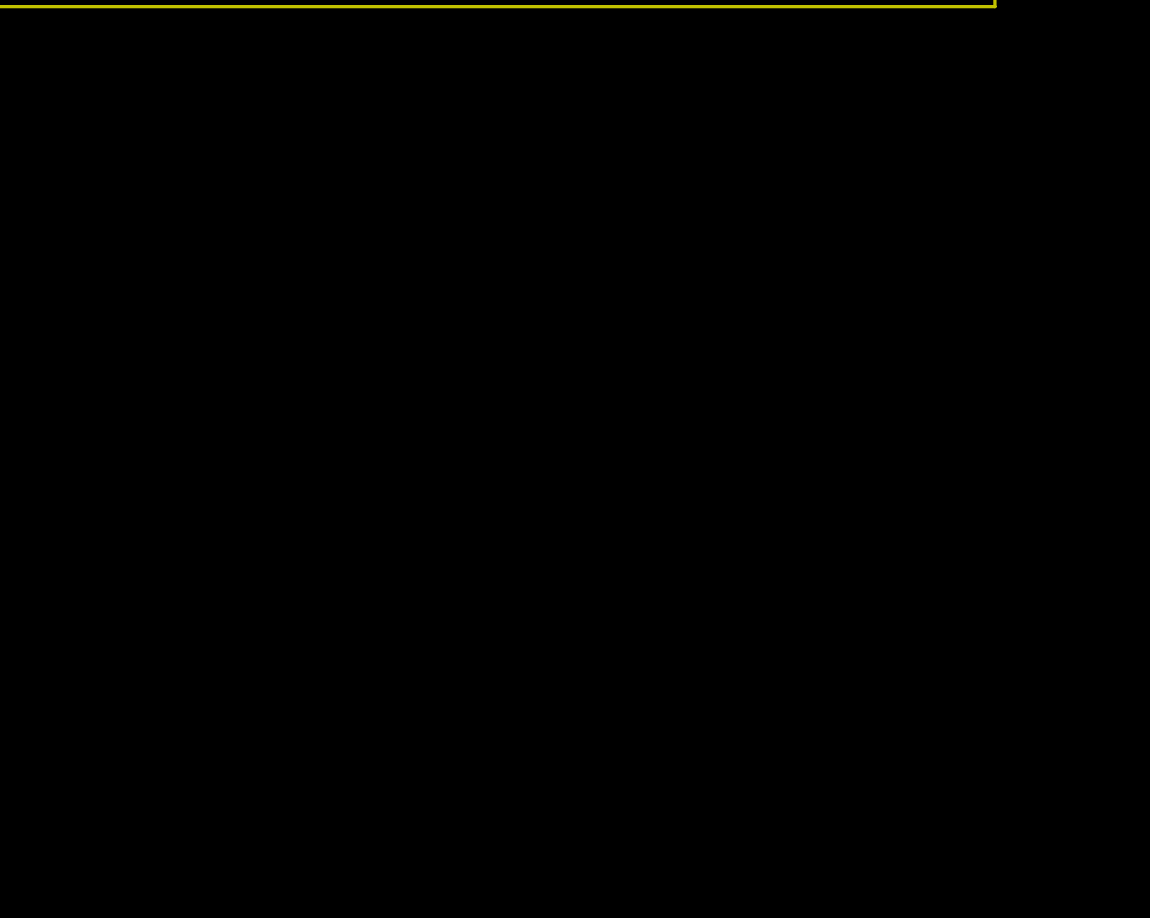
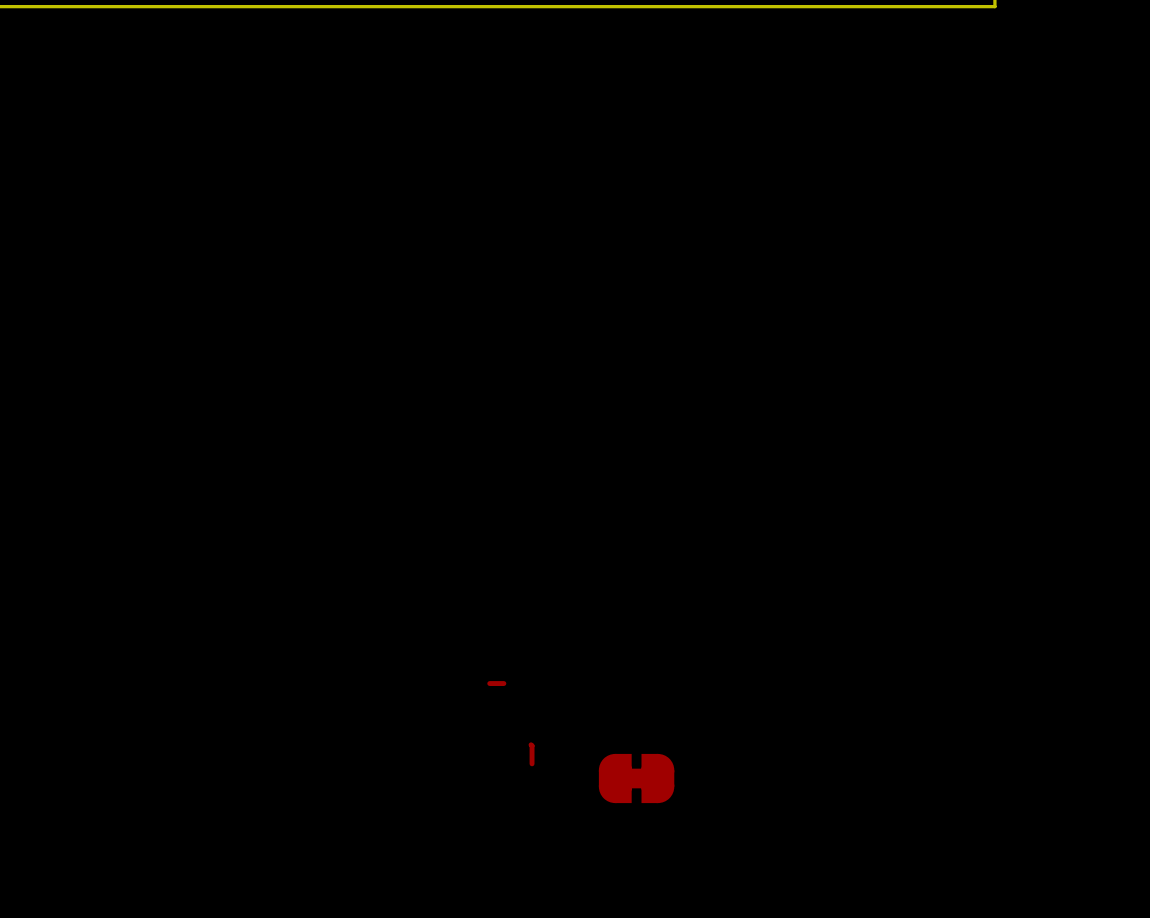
top track: none -> (503, 683) (489, 683)
top track: none -> (531, 744) (532, 763)
part: none -> (636, 778)

